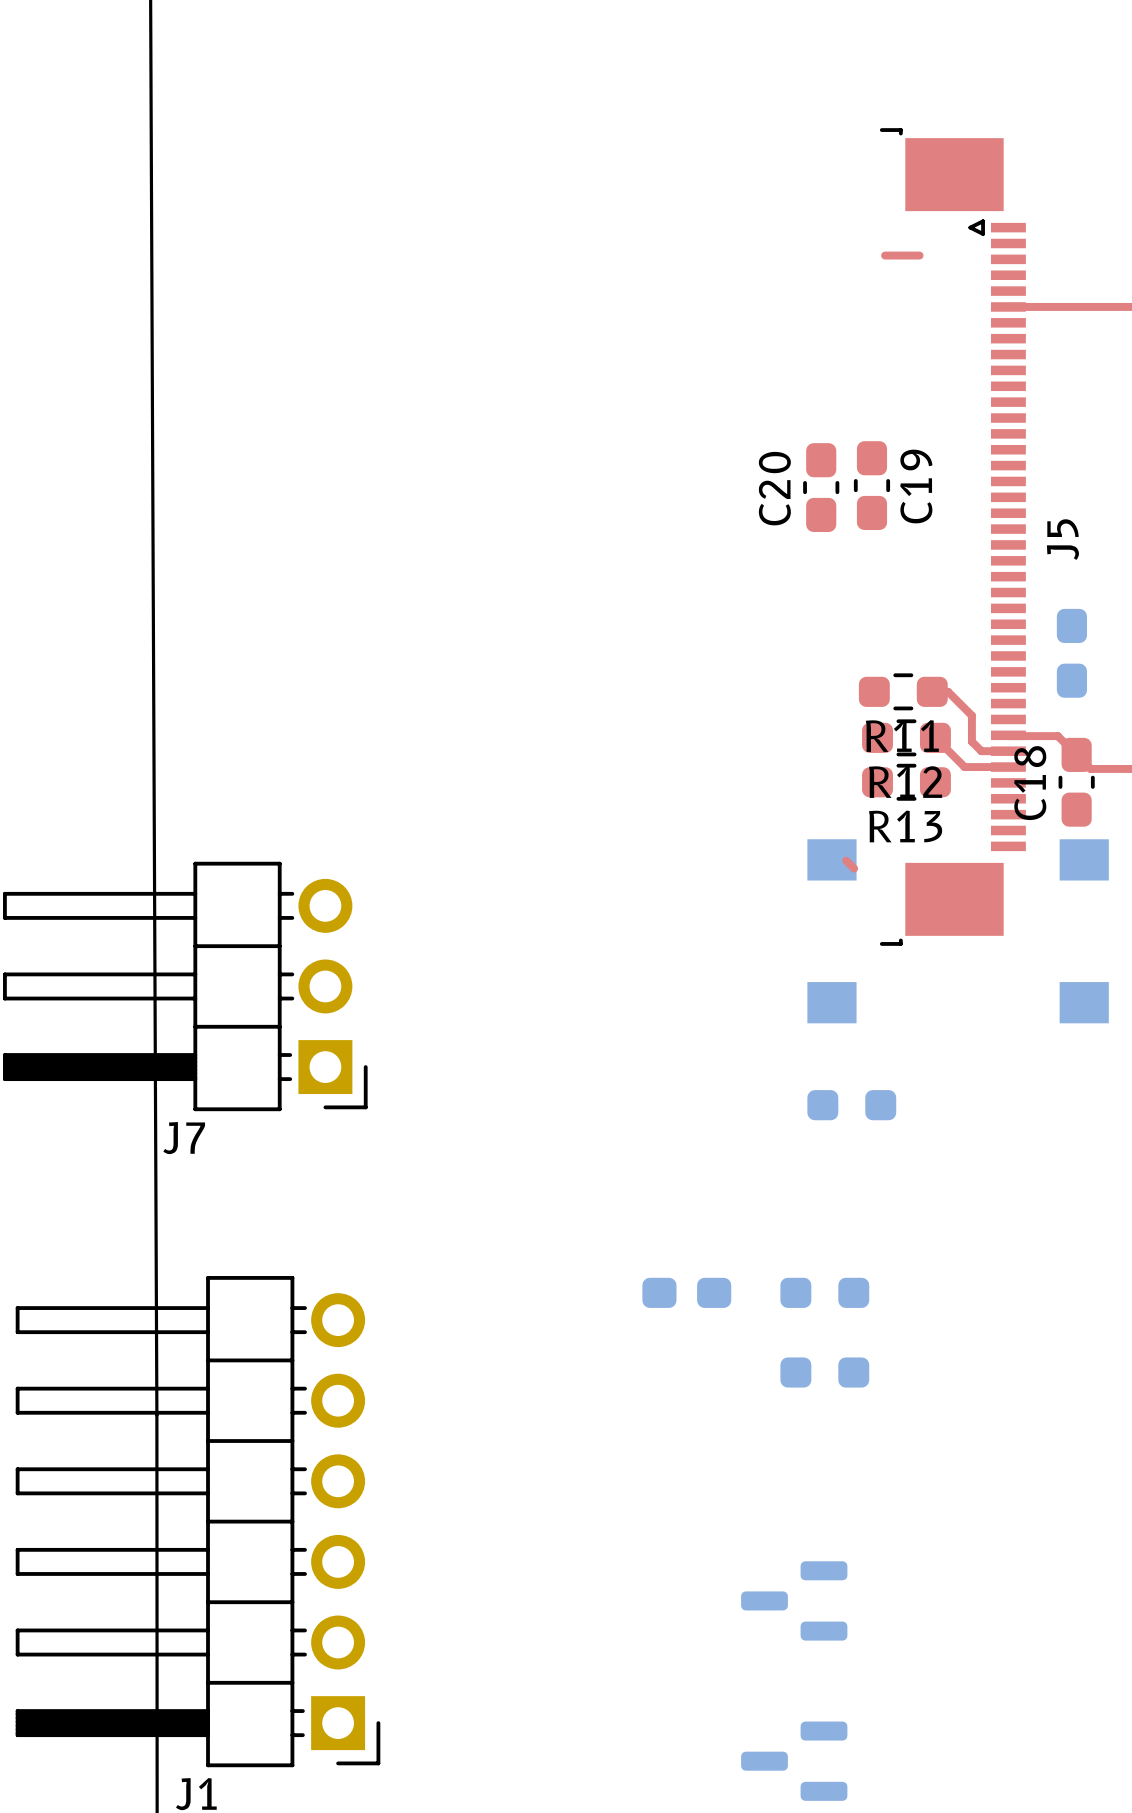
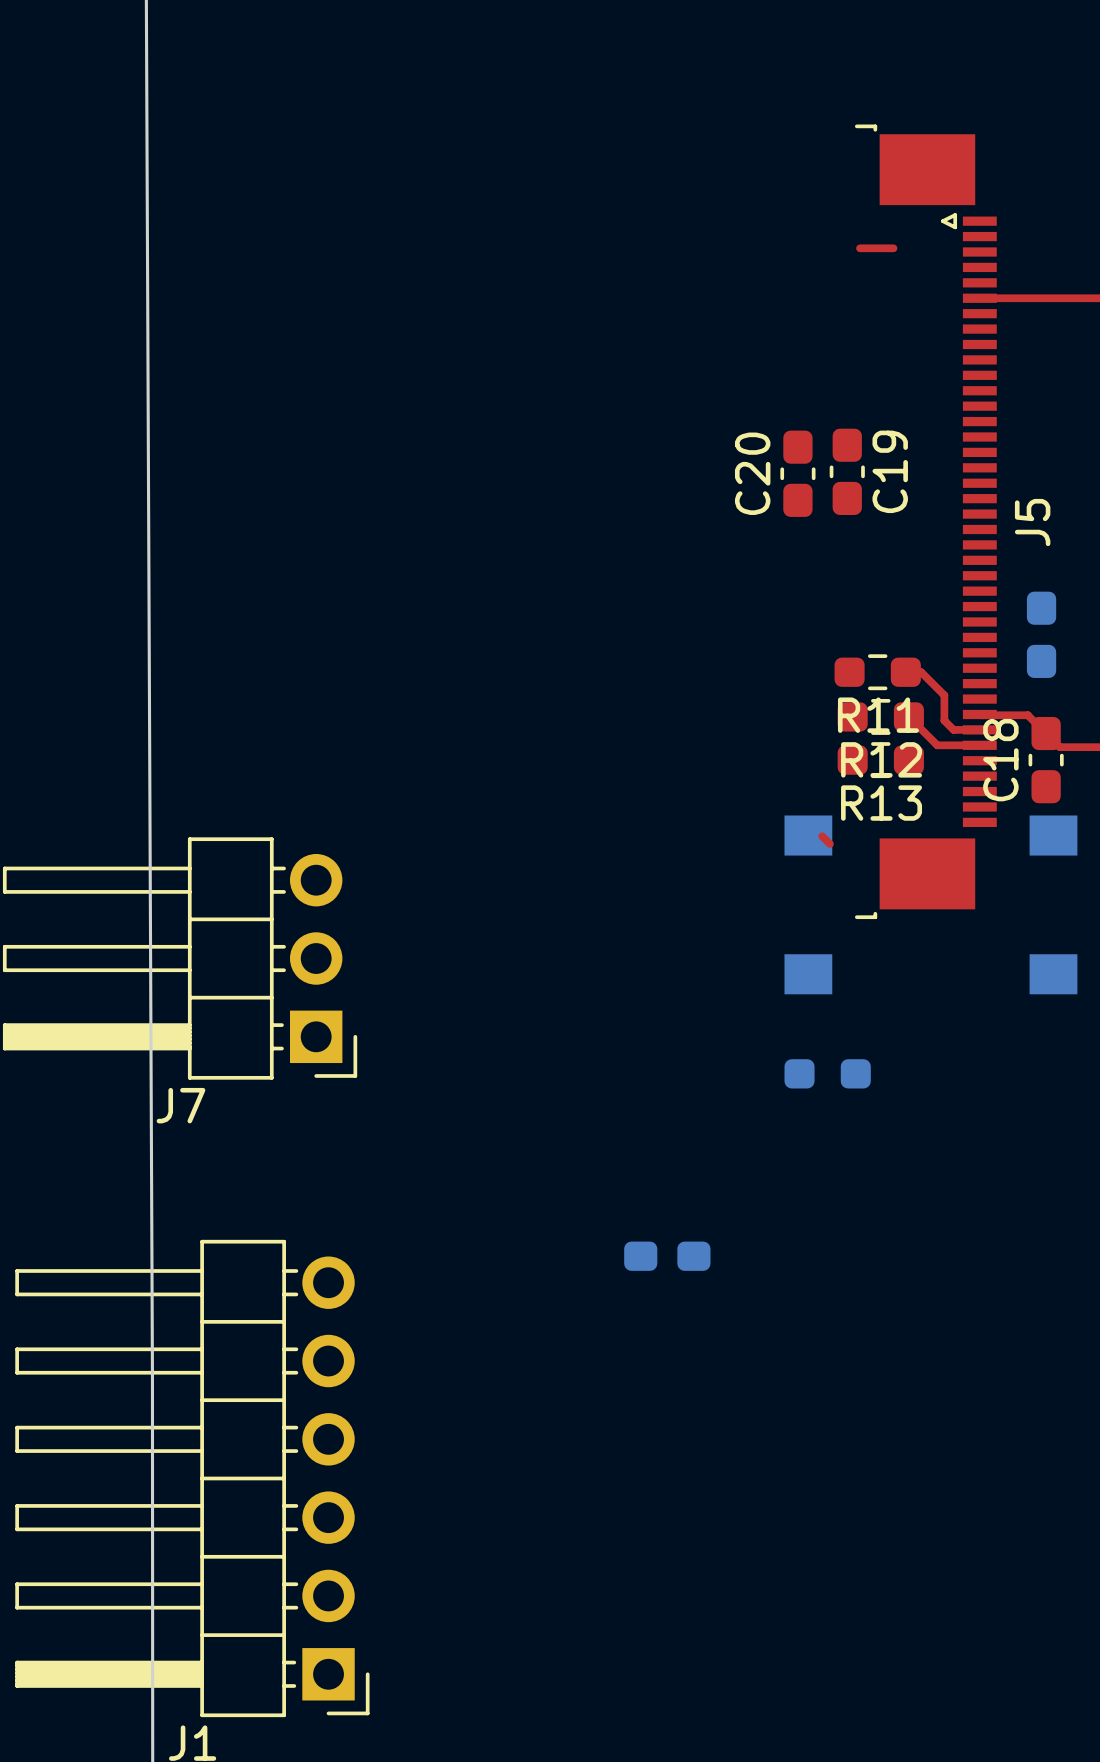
part: (824, 1292) -> none
part: (824, 1372) -> none
part: (794, 1600) -> none
part: (794, 1761) -> none

